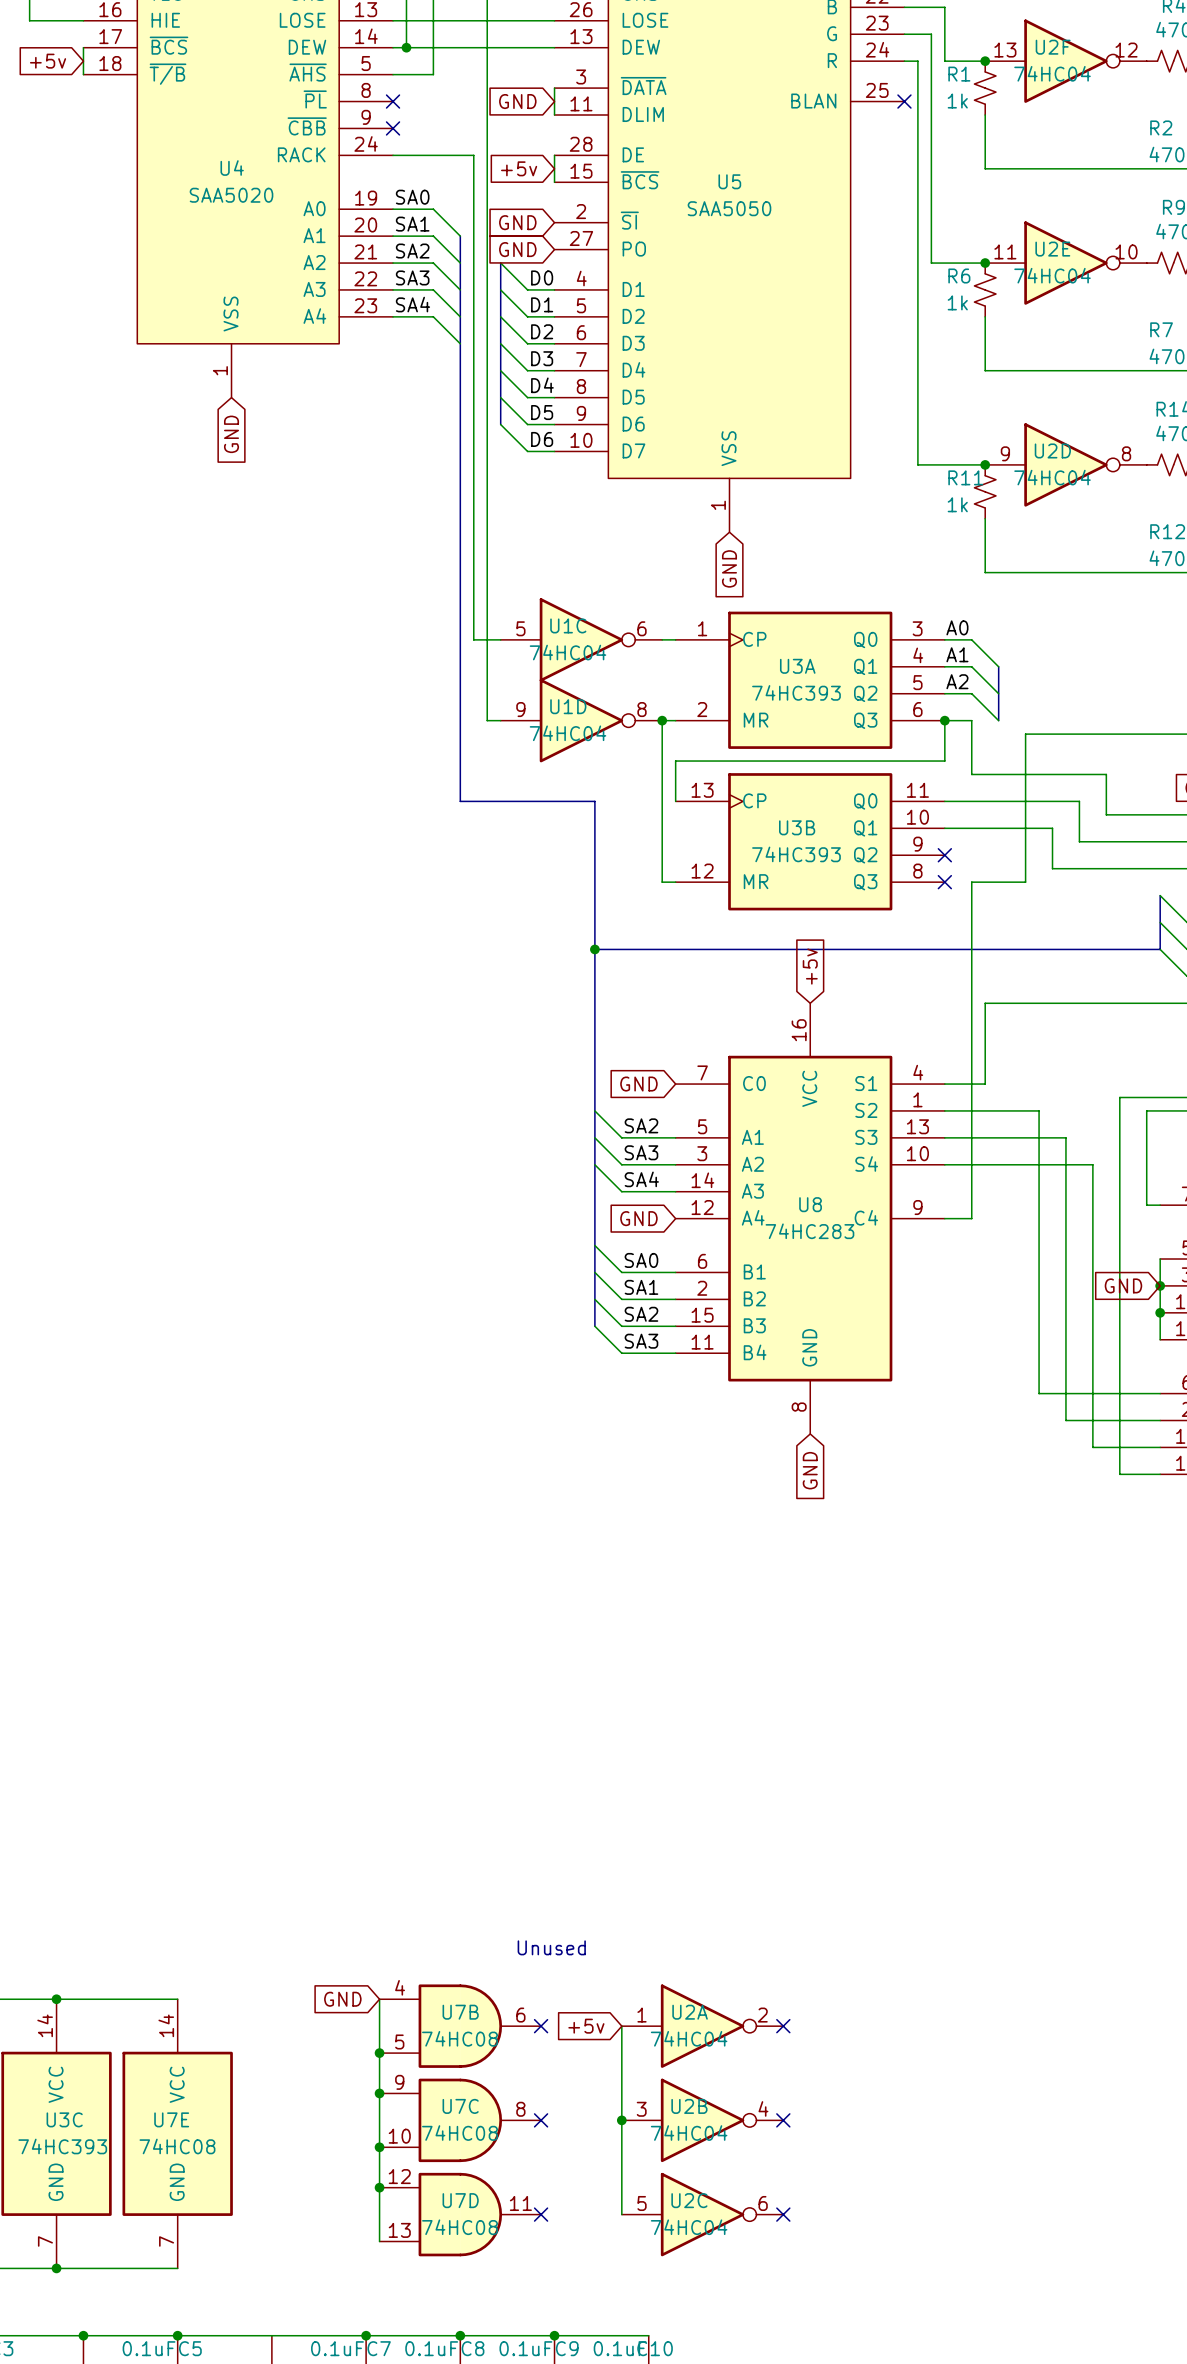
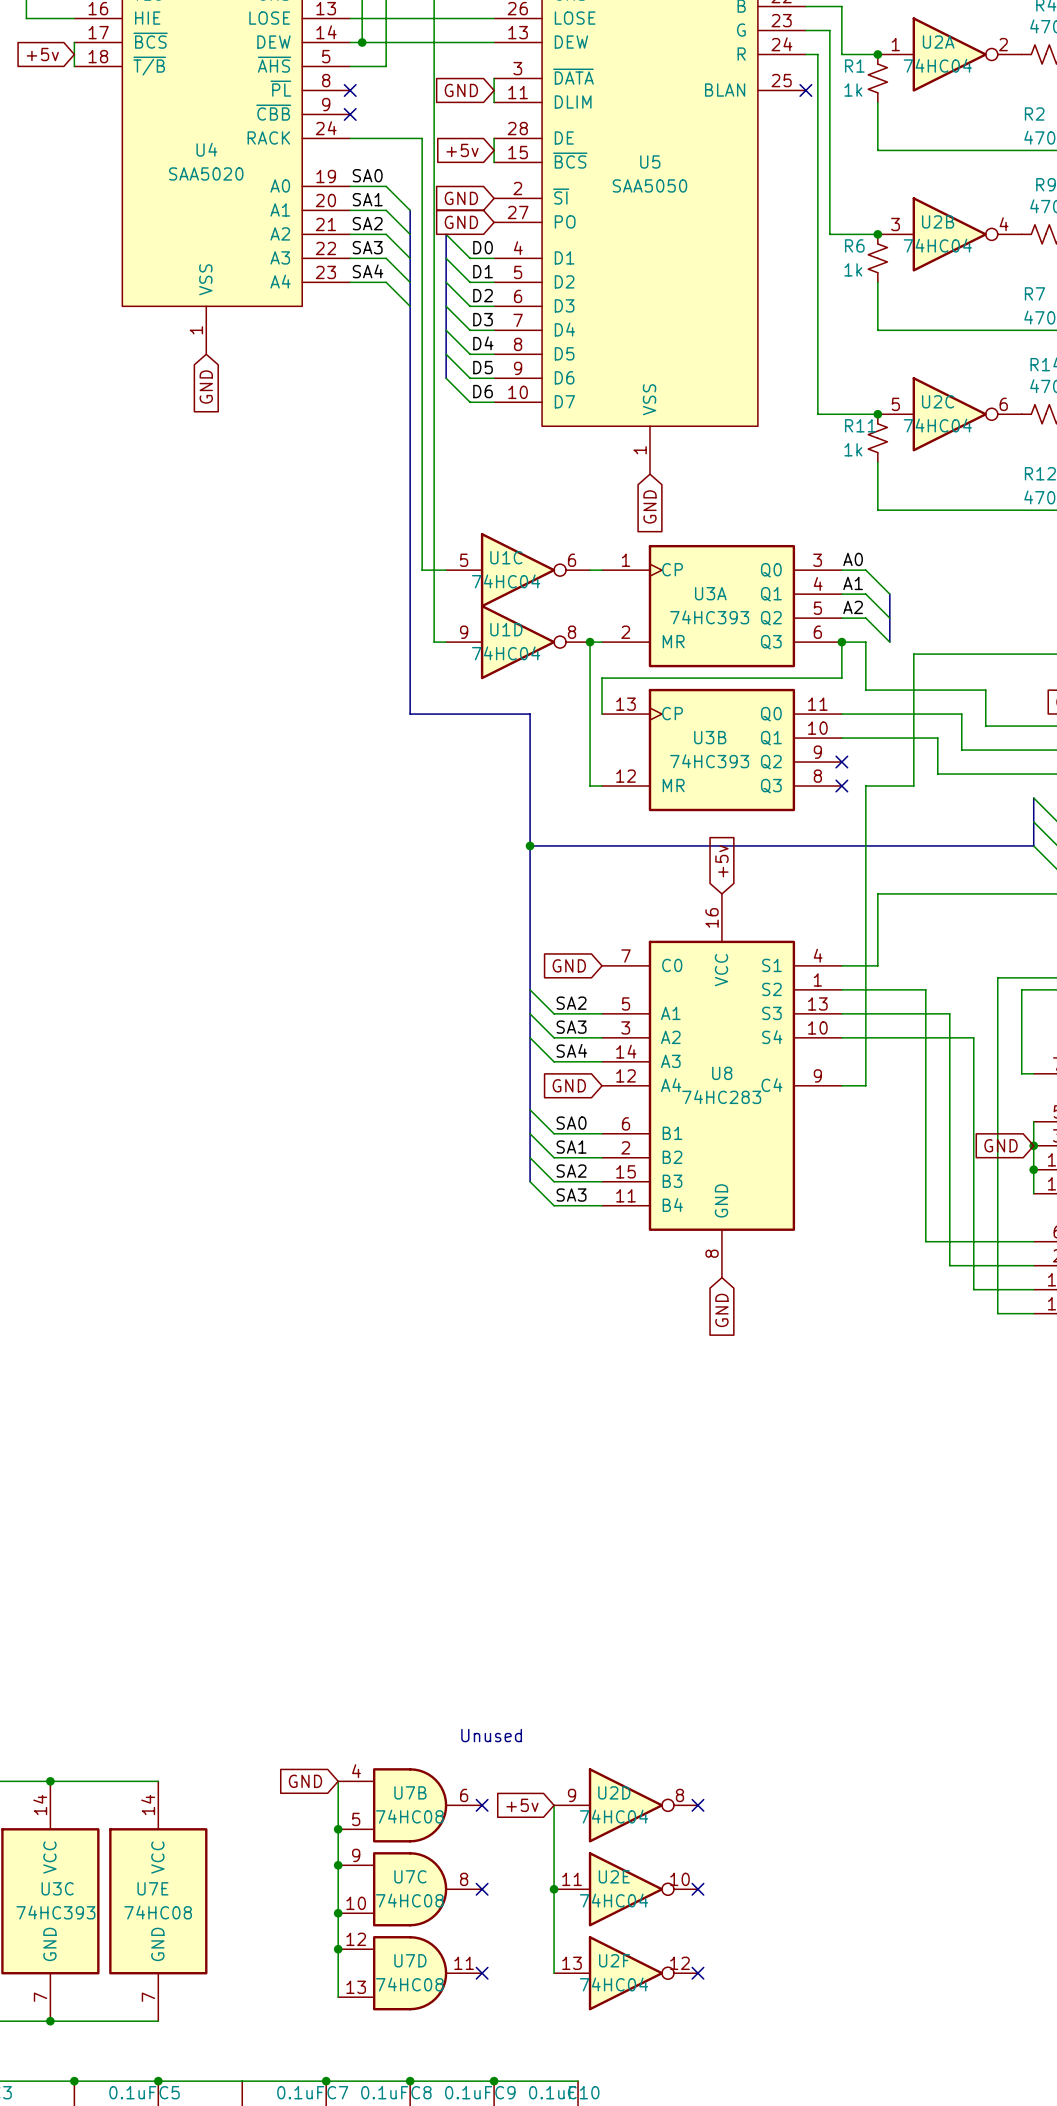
U2F position: (1065, 61) -> (626, 1973)
U2E position: (1065, 263) -> (626, 1889)
U2D position: (1065, 464) -> (626, 1805)
U2A position: (702, 2026) -> (949, 54)
U2B position: (702, 2120) -> (949, 234)
U2C position: (702, 2214) -> (949, 414)

